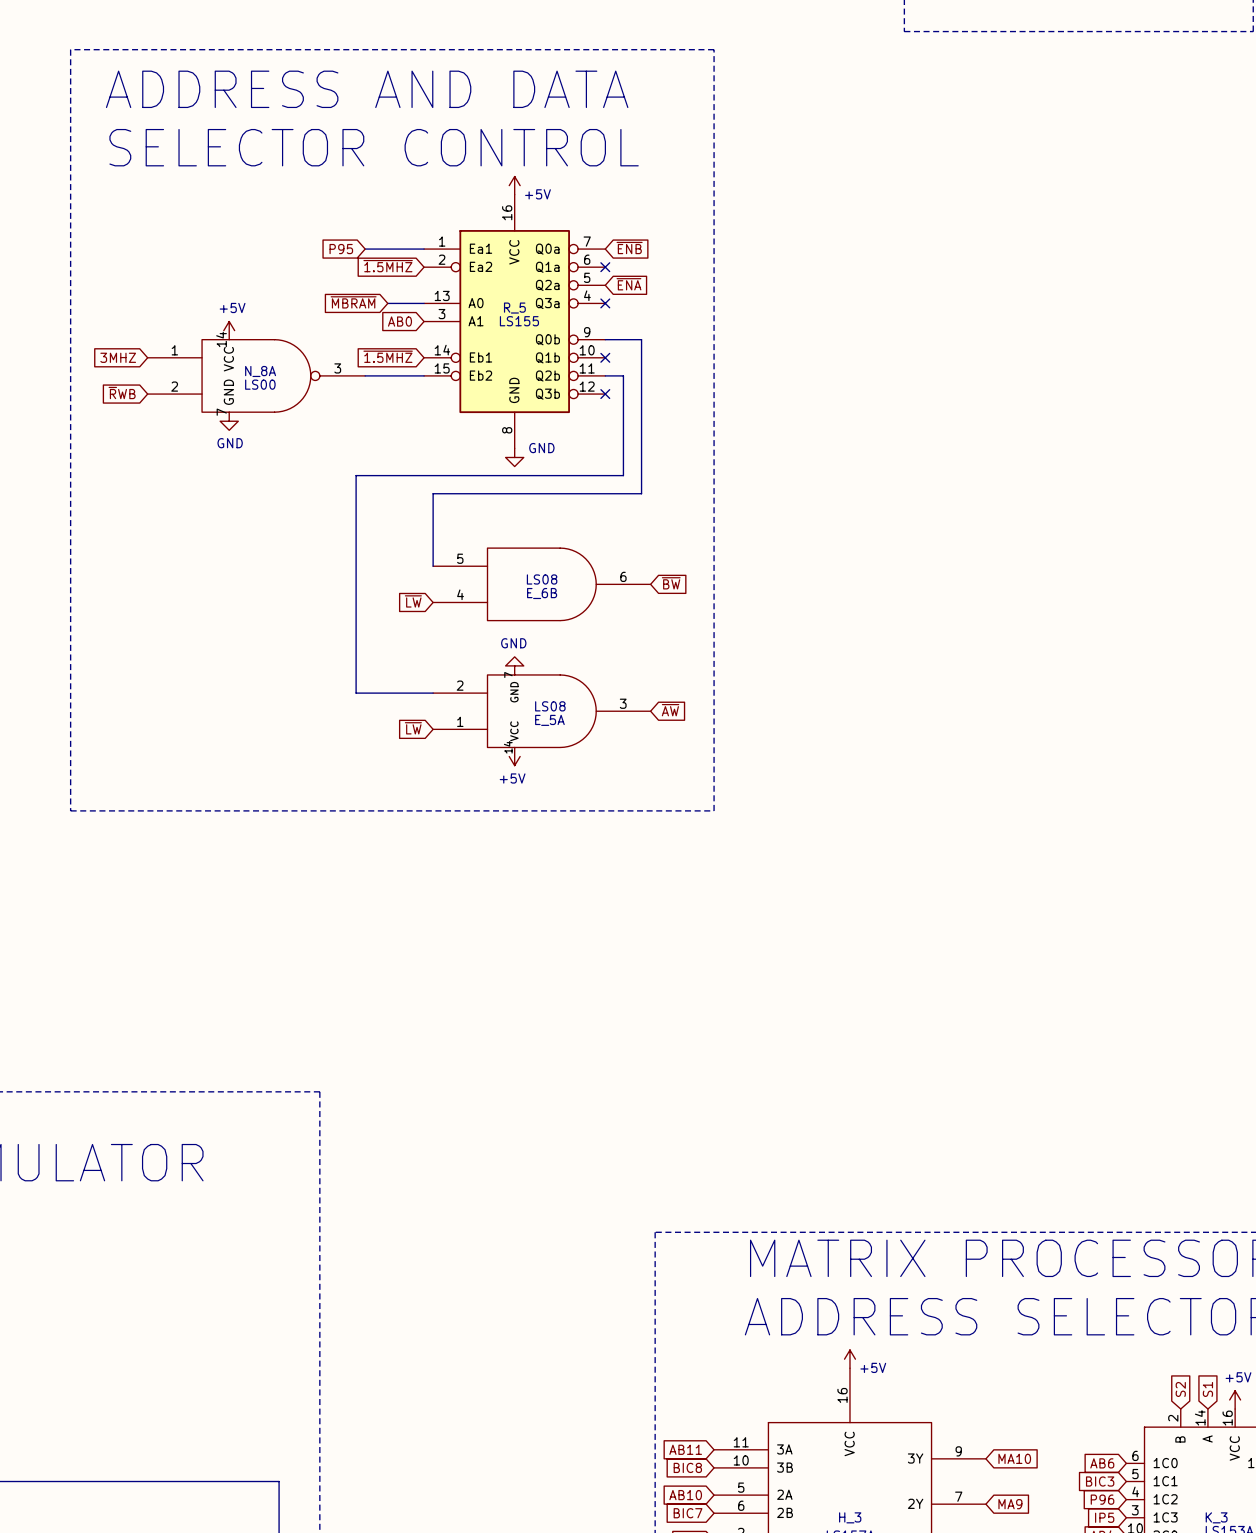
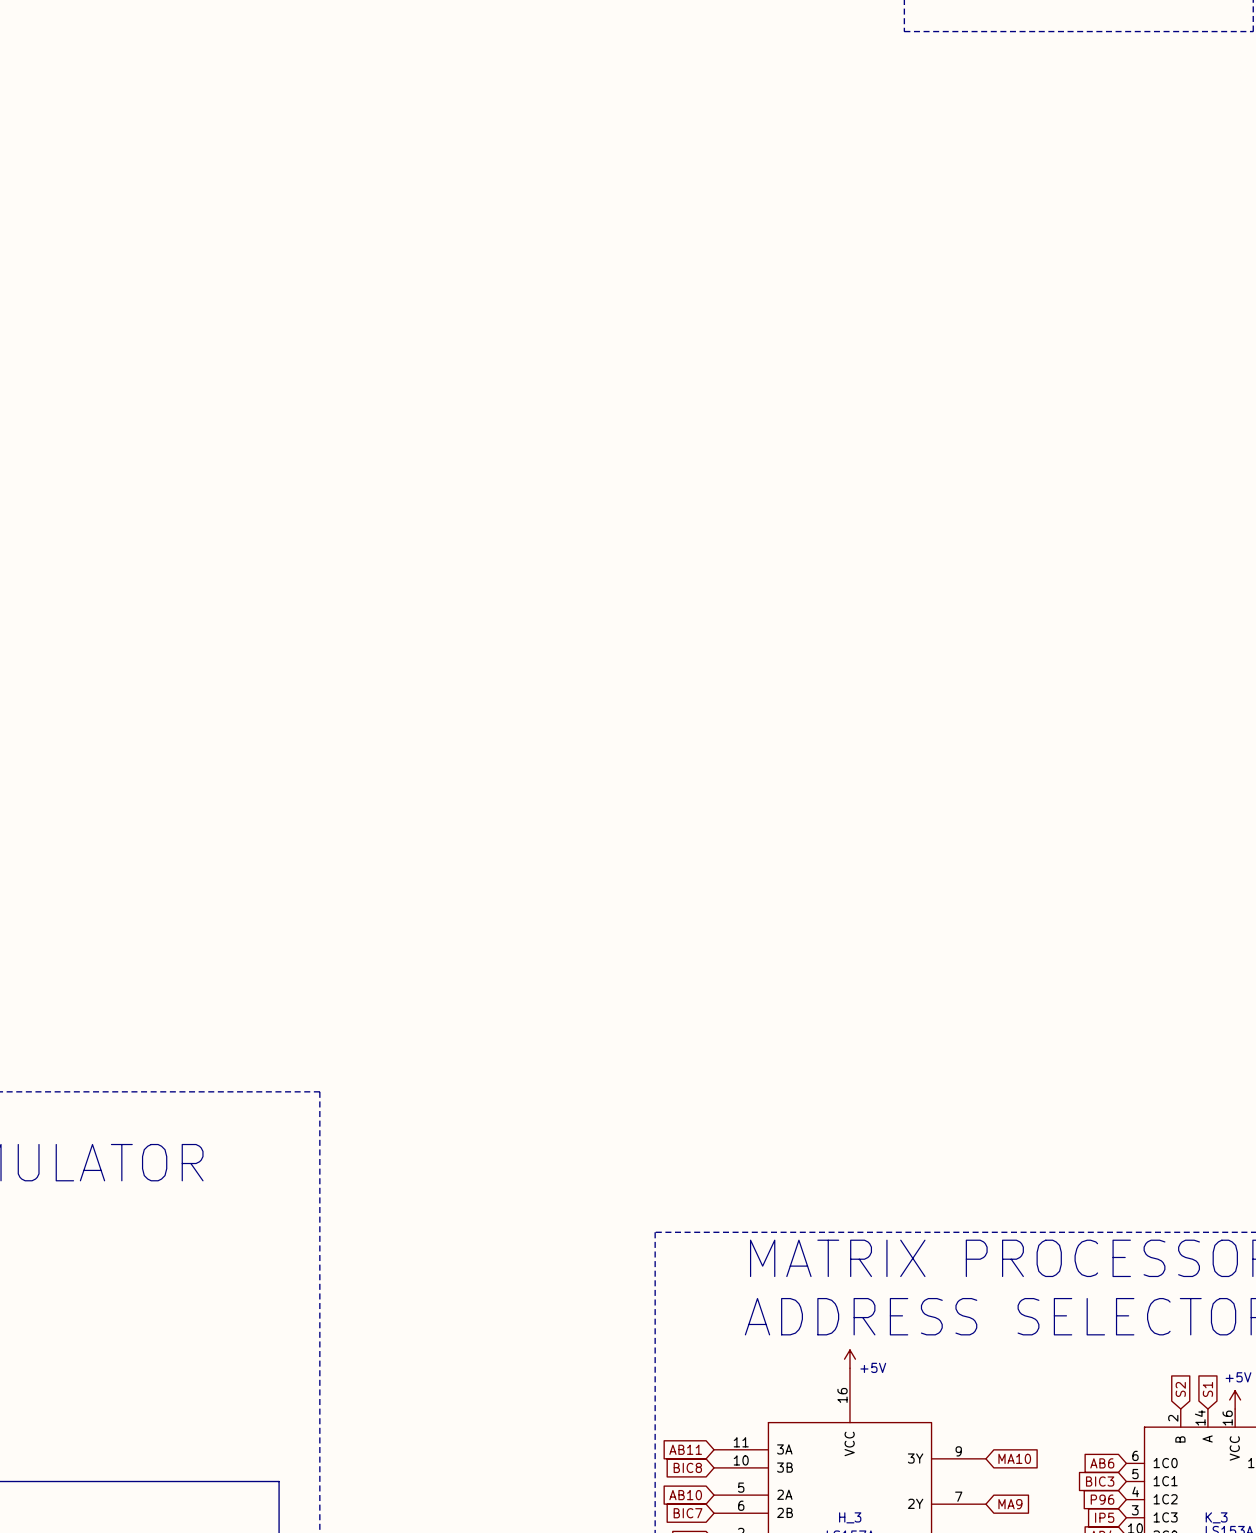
line: (70, 49) (70, 810) (714, 810) (714, 49) (70, 49) -> none
text: ADDRESS AND DATA (367, 89) -> none
text: SELECTOR CONTROL (374, 147) -> none
power symbol: +5V (514, 185) -> none
global label: ~{ENB} (629, 248) -> none
global label: P95 (341, 249) -> none
wire: (365, 249) (424, 249) -> none
global label: ~{1.5MHZ} (388, 266) -> none
no-connect mark: (605, 267) -> none
global label: ~{ENA} (628, 284) -> none
global label: ~{MBRAM} (353, 302) -> none
wire: (387, 303) (424, 303) -> none
no-connect mark: (605, 303) -> none
global label: AB0 (399, 321) -> none
R_5: LS155 (514, 321) -> none
power symbol: +5V (229, 330) -> none
wire: (605, 339) (641, 339) (641, 493) (433, 493) (433, 566) -> none
global label: ~{1.5MHZ} (388, 356) -> none
global label: 3MHZ (118, 357) -> none
no-connect mark: (605, 357) -> none
N_8A: LS00 (256, 375) -> none
wire: (365, 375) (424, 375) -> none
wire: (605, 375) (623, 375) (623, 475) (356, 475) (356, 693) (433, 693) -> none
global label: ~{R}WB (122, 393) -> none
no-connect mark: (605, 394) -> none
power symbol: GND (229, 421) -> none
power symbol: GND (514, 457) -> none
global label: ~{BW} (671, 583) -> none
E_6B: LS08 (541, 584) -> none
global label: ~{LW} (413, 601) -> none
power symbol: GND (514, 665) -> none
global label: ~{AW} (670, 710) -> none
E_5A: LS08 (541, 711) -> none
global label: ~{LW} (413, 728) -> none
power symbol: +5V (514, 756) -> none

